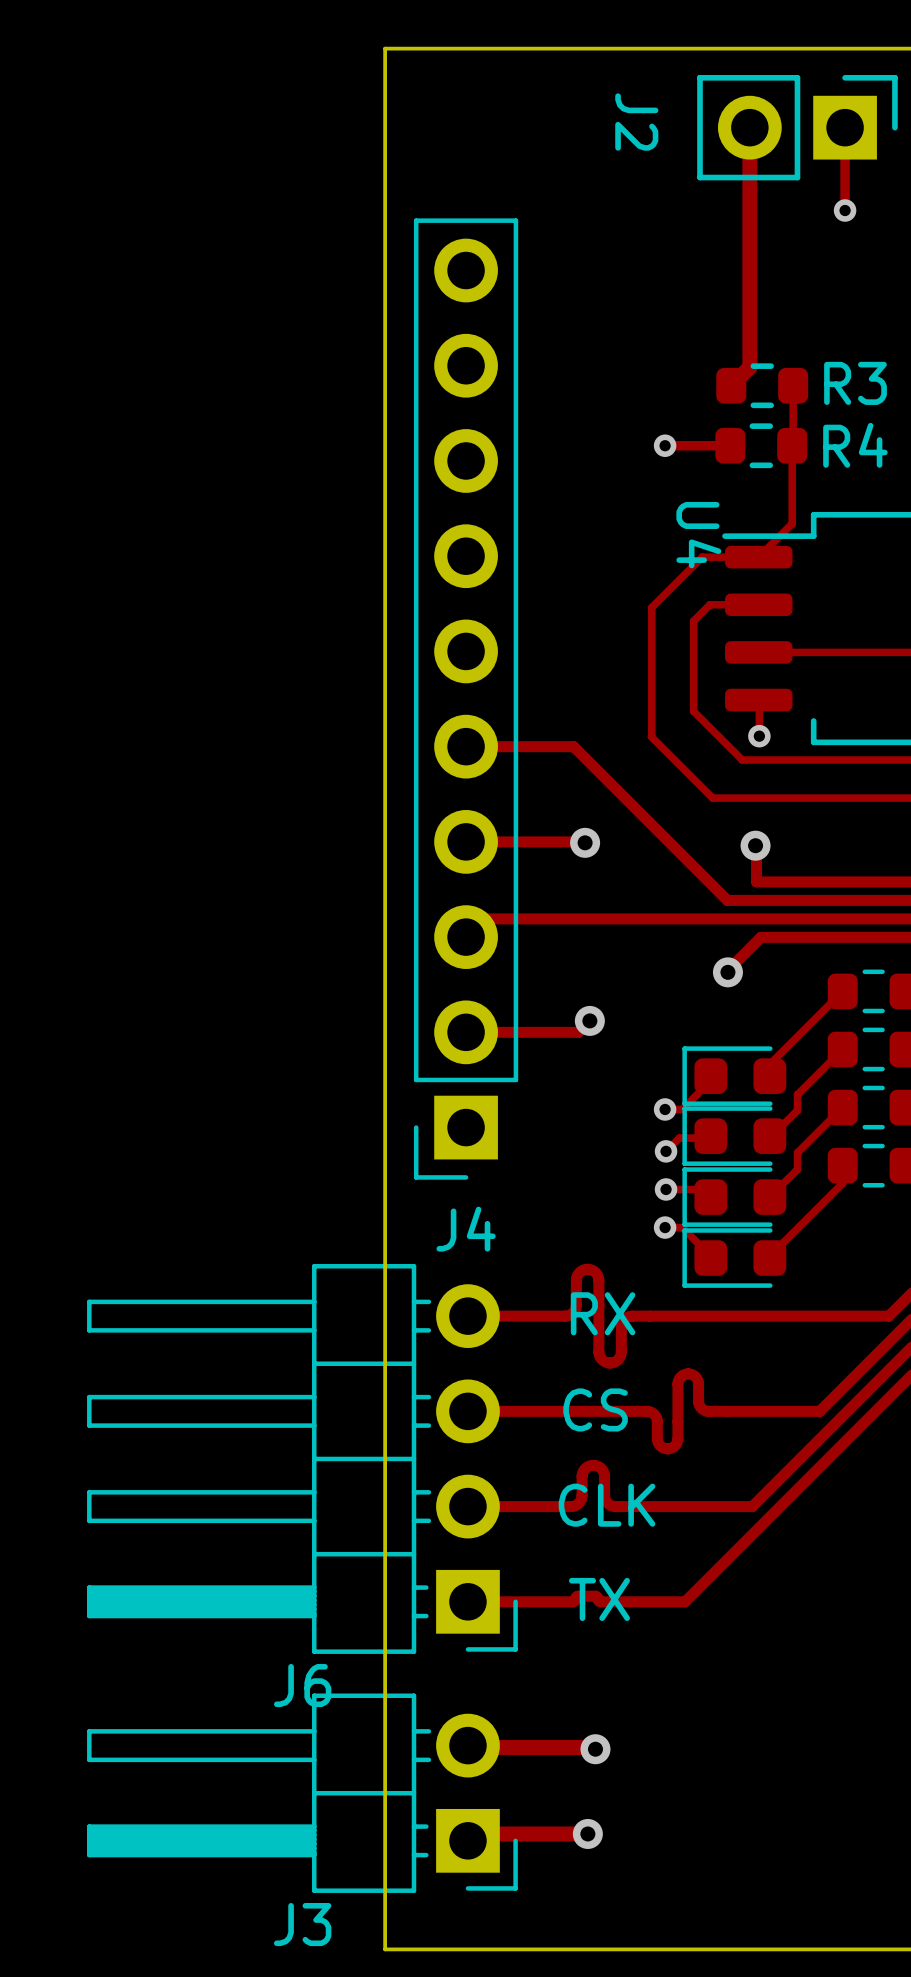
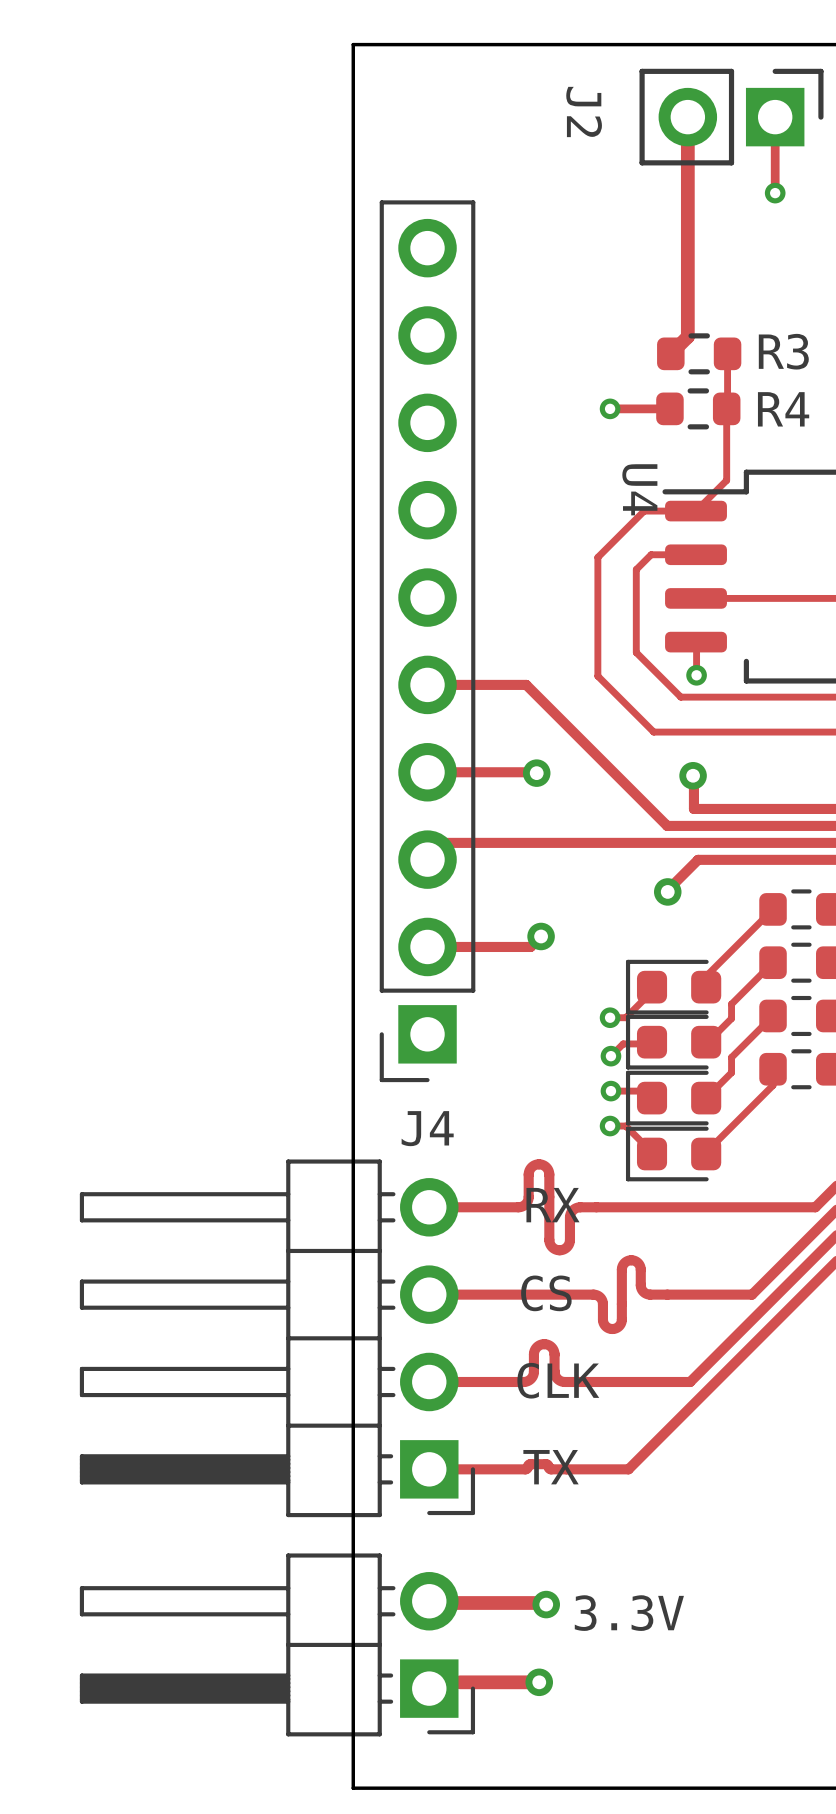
J6 name: J6 (302, 1685) -> none
text: none -> 3.3V (629, 1613)
J3 name: J3 (302, 1924) -> none

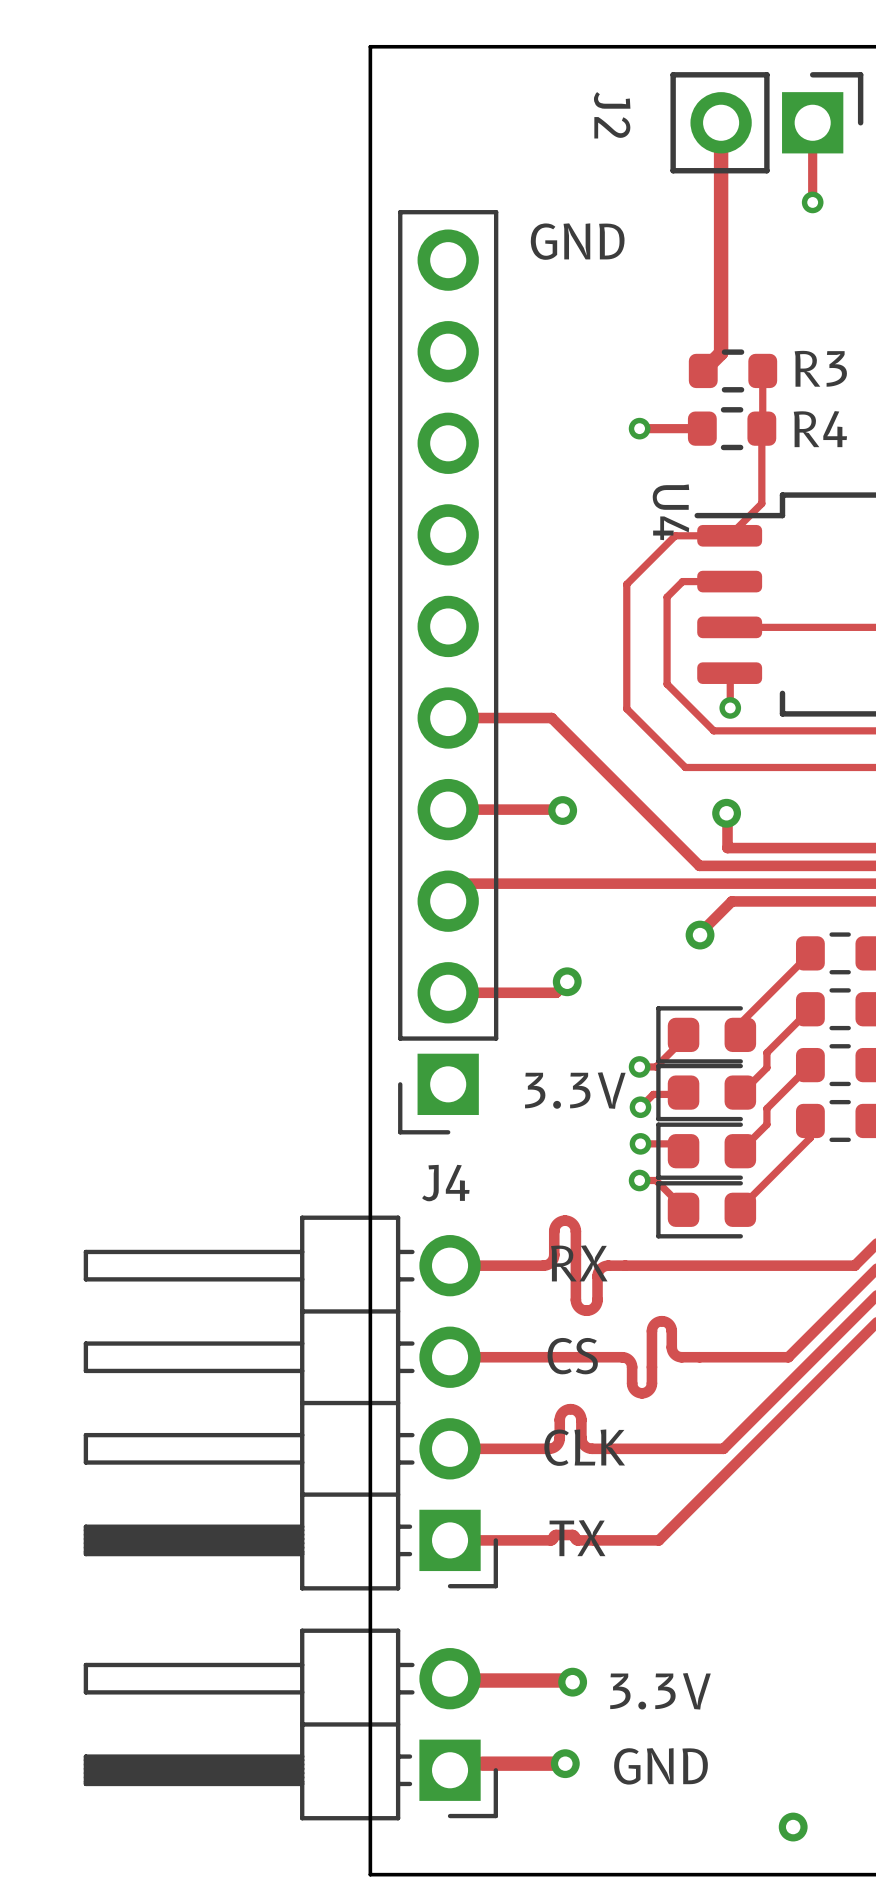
text: none -> GND (577, 241)
text: none -> 3.3V (575, 1090)
text: none -> GND (660, 1766)
via: none -> (793, 1827)

